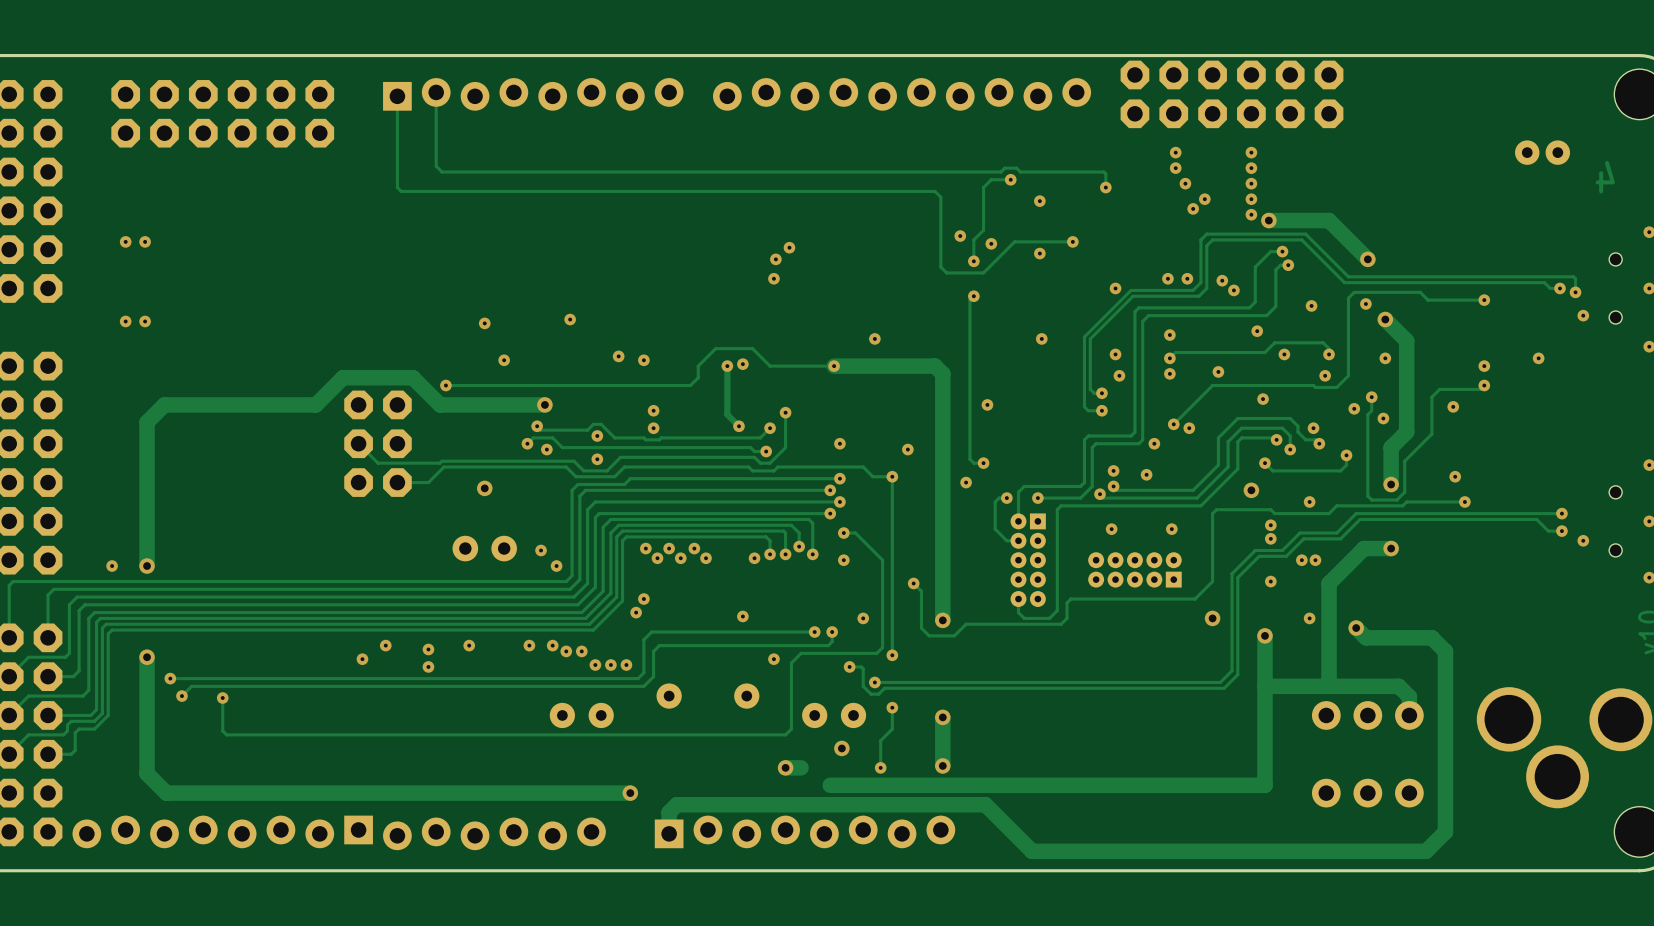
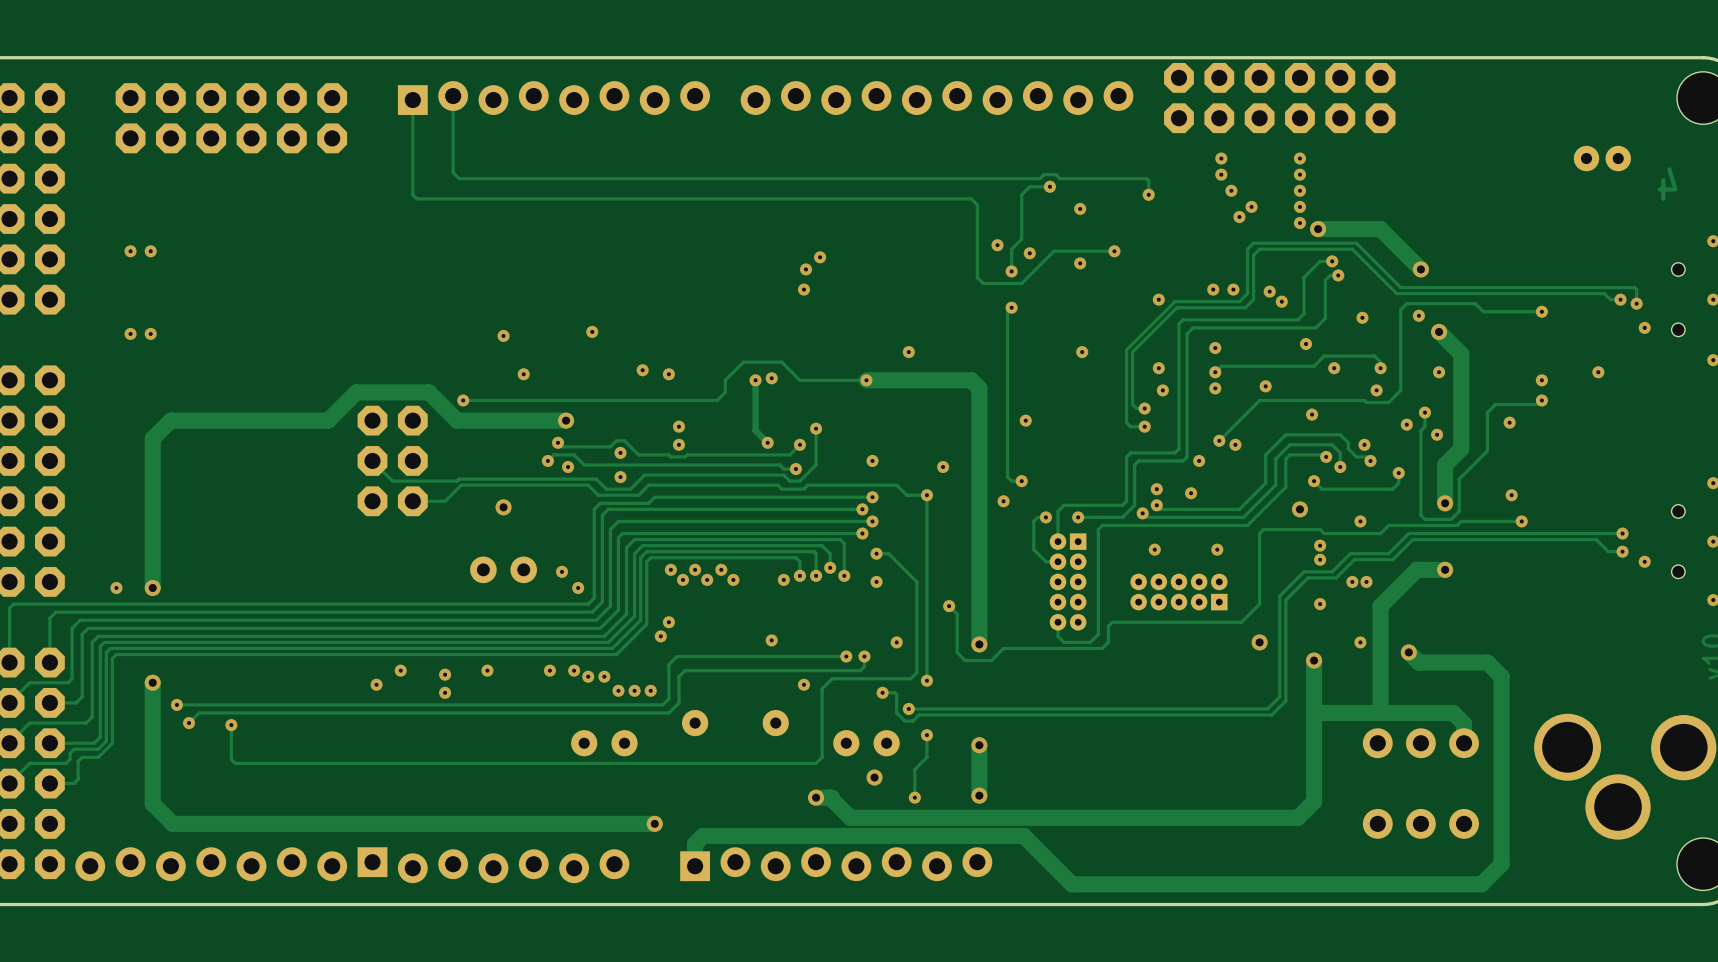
track: (1264, 771) (1264, 785) (830, 785) -> (1314, 801) (1297, 817) (850, 817) (830, 797)

